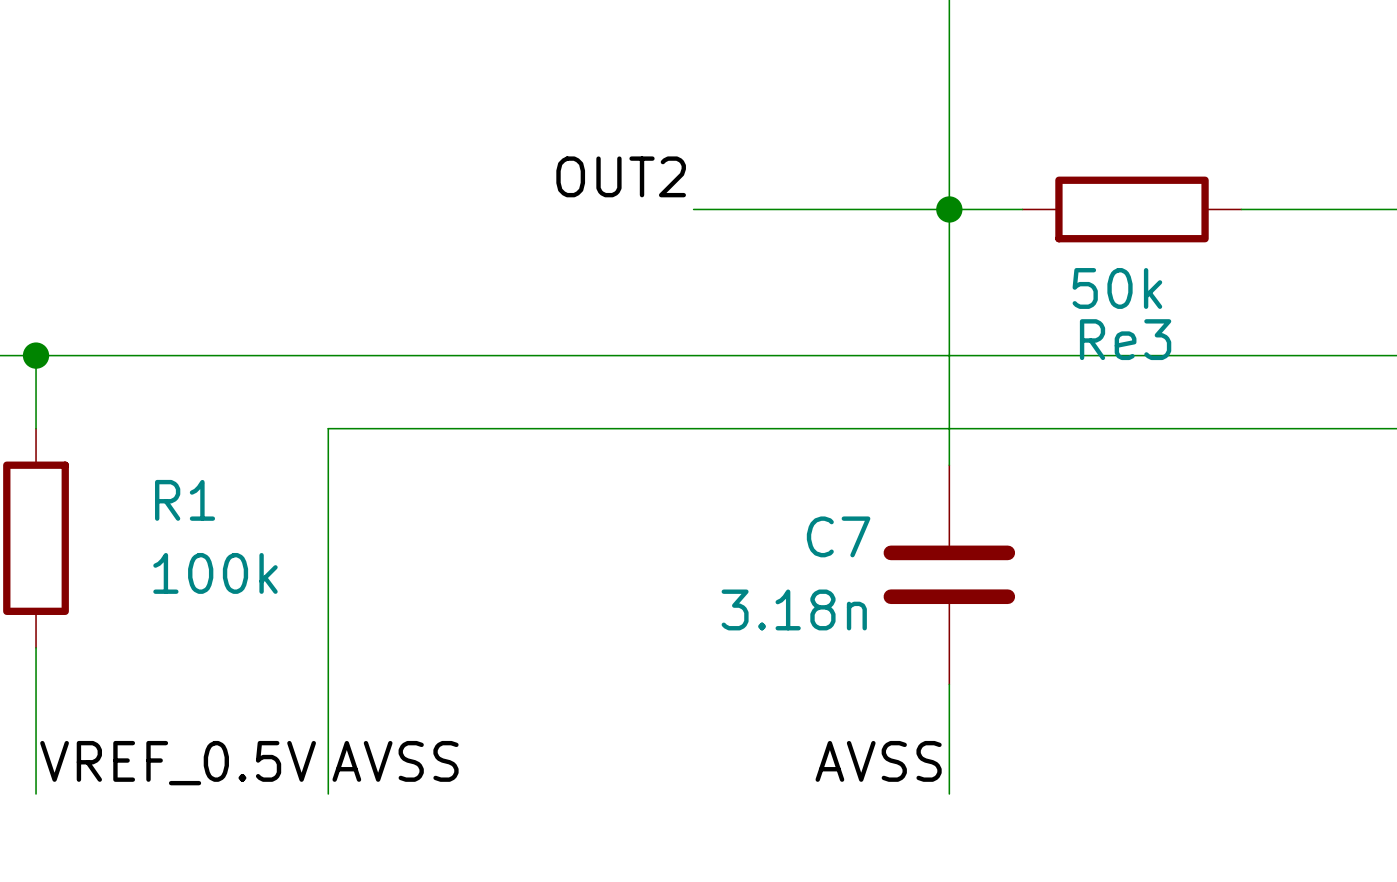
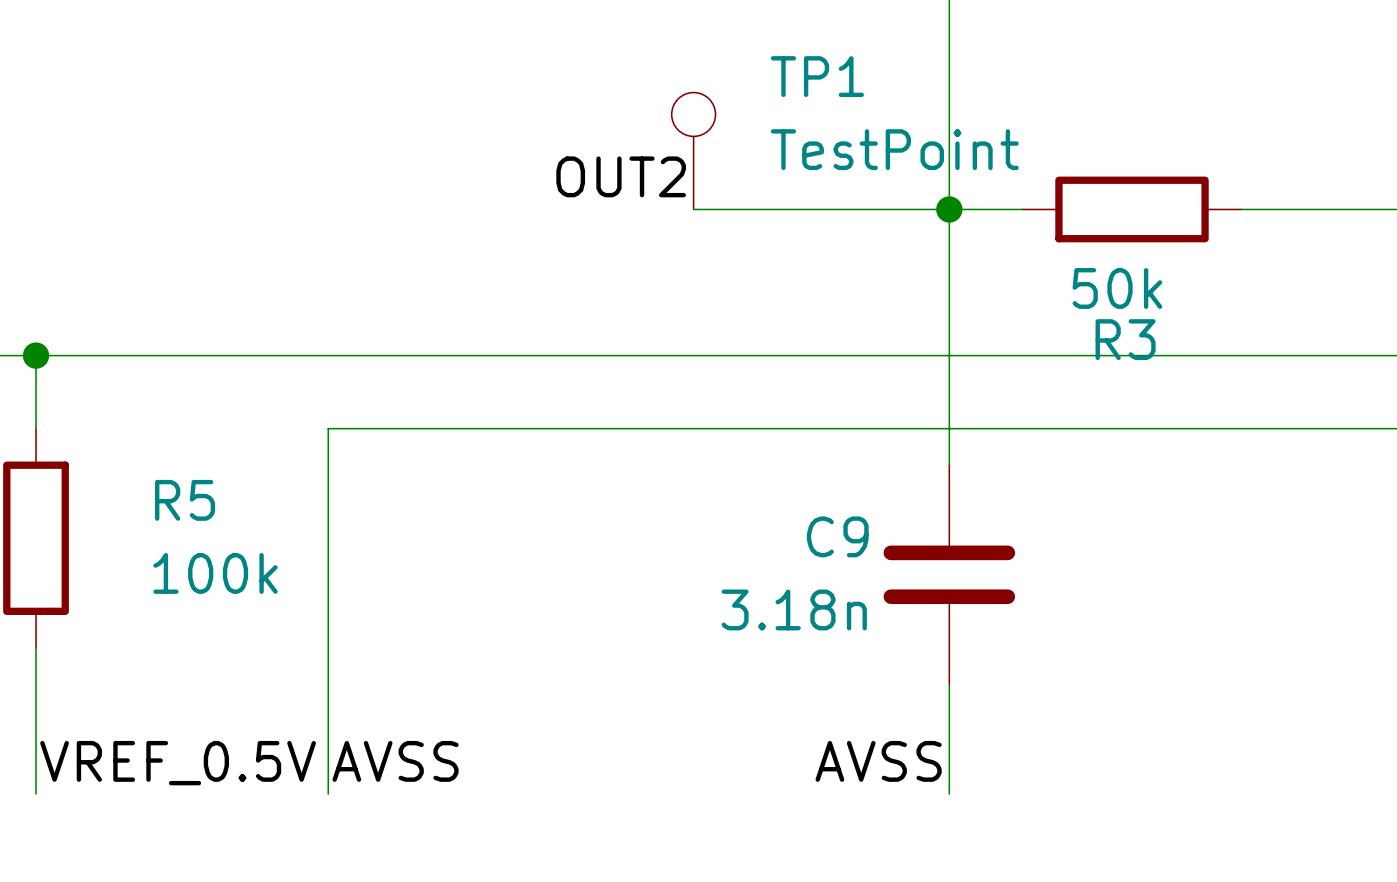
TP1: none -> TestPoint (693, 151)
Re3 name: Re3 (1125, 339) -> R3 (1125, 339)
R1 name: R1 (185, 500) -> R5 (185, 500)
C7 name: C7 (838, 536) -> C9 (837, 536)

